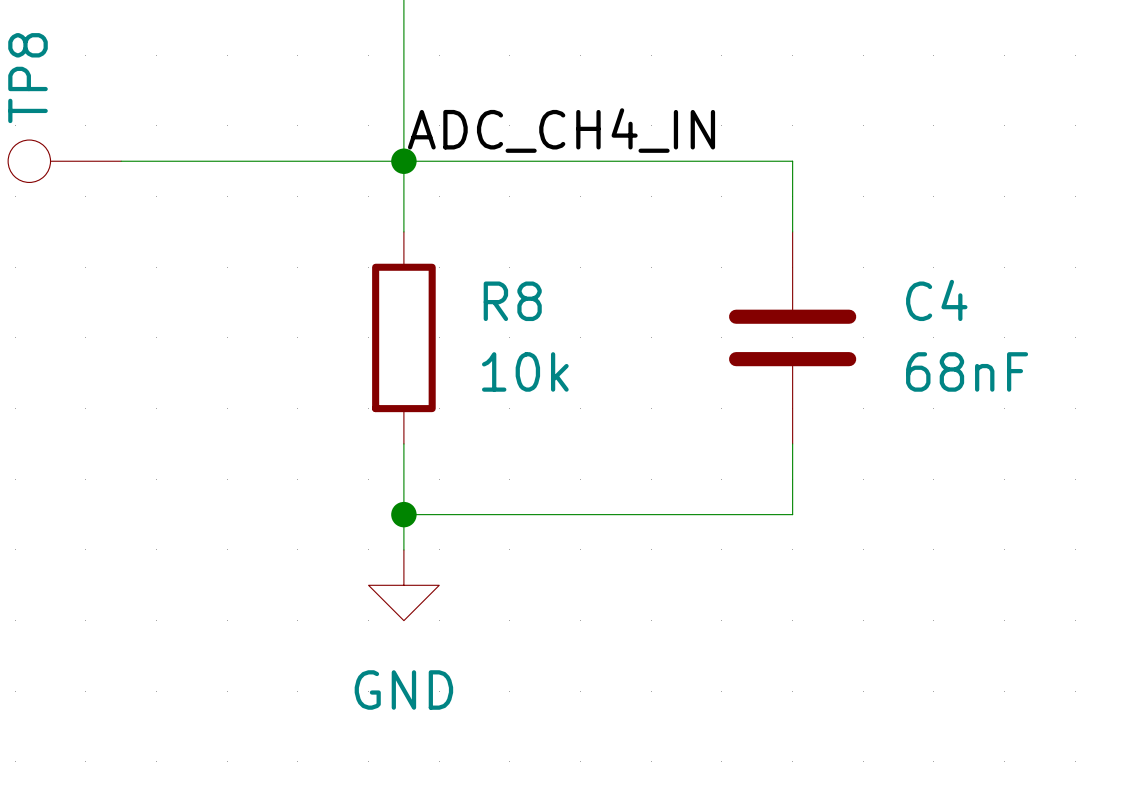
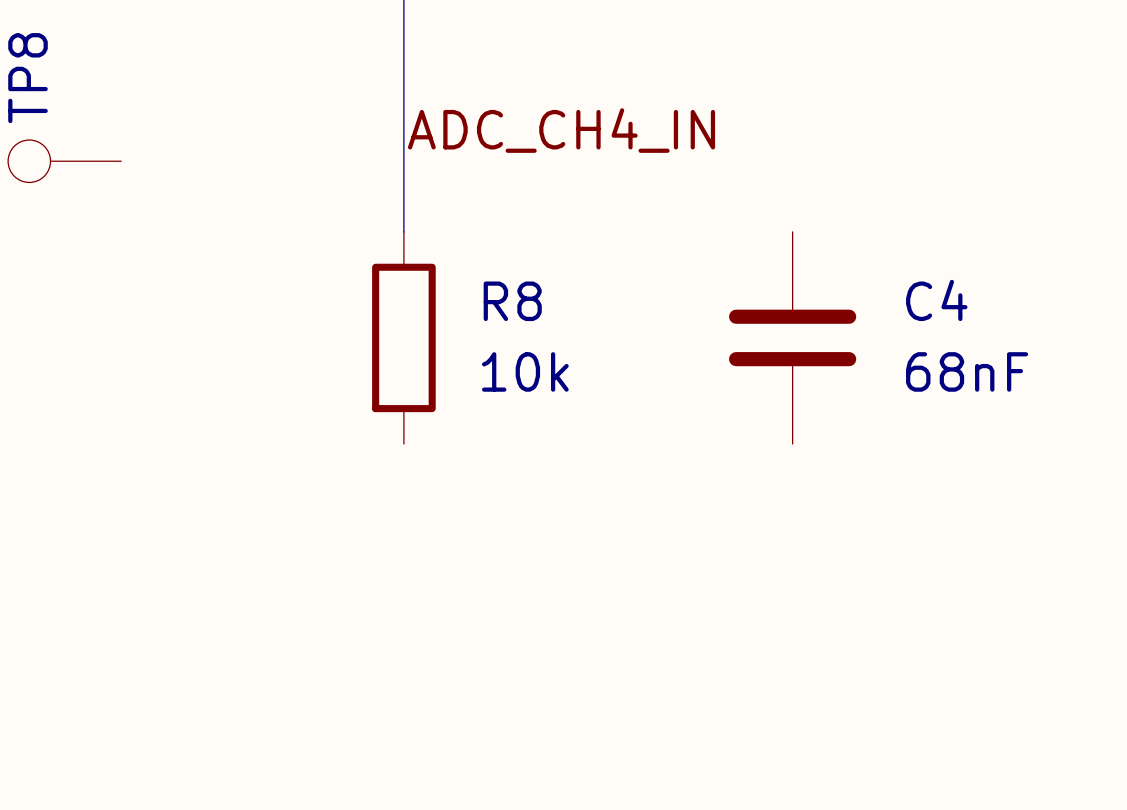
wire: (121, 161) (792, 161) (792, 231) -> none
junction: (403, 161) -> none
wire: (403, 443) (403, 549) -> none
wire: (792, 443) (792, 514) (403, 514) -> none
junction: (403, 514) -> none
power symbol: GND (403, 585) -> none

